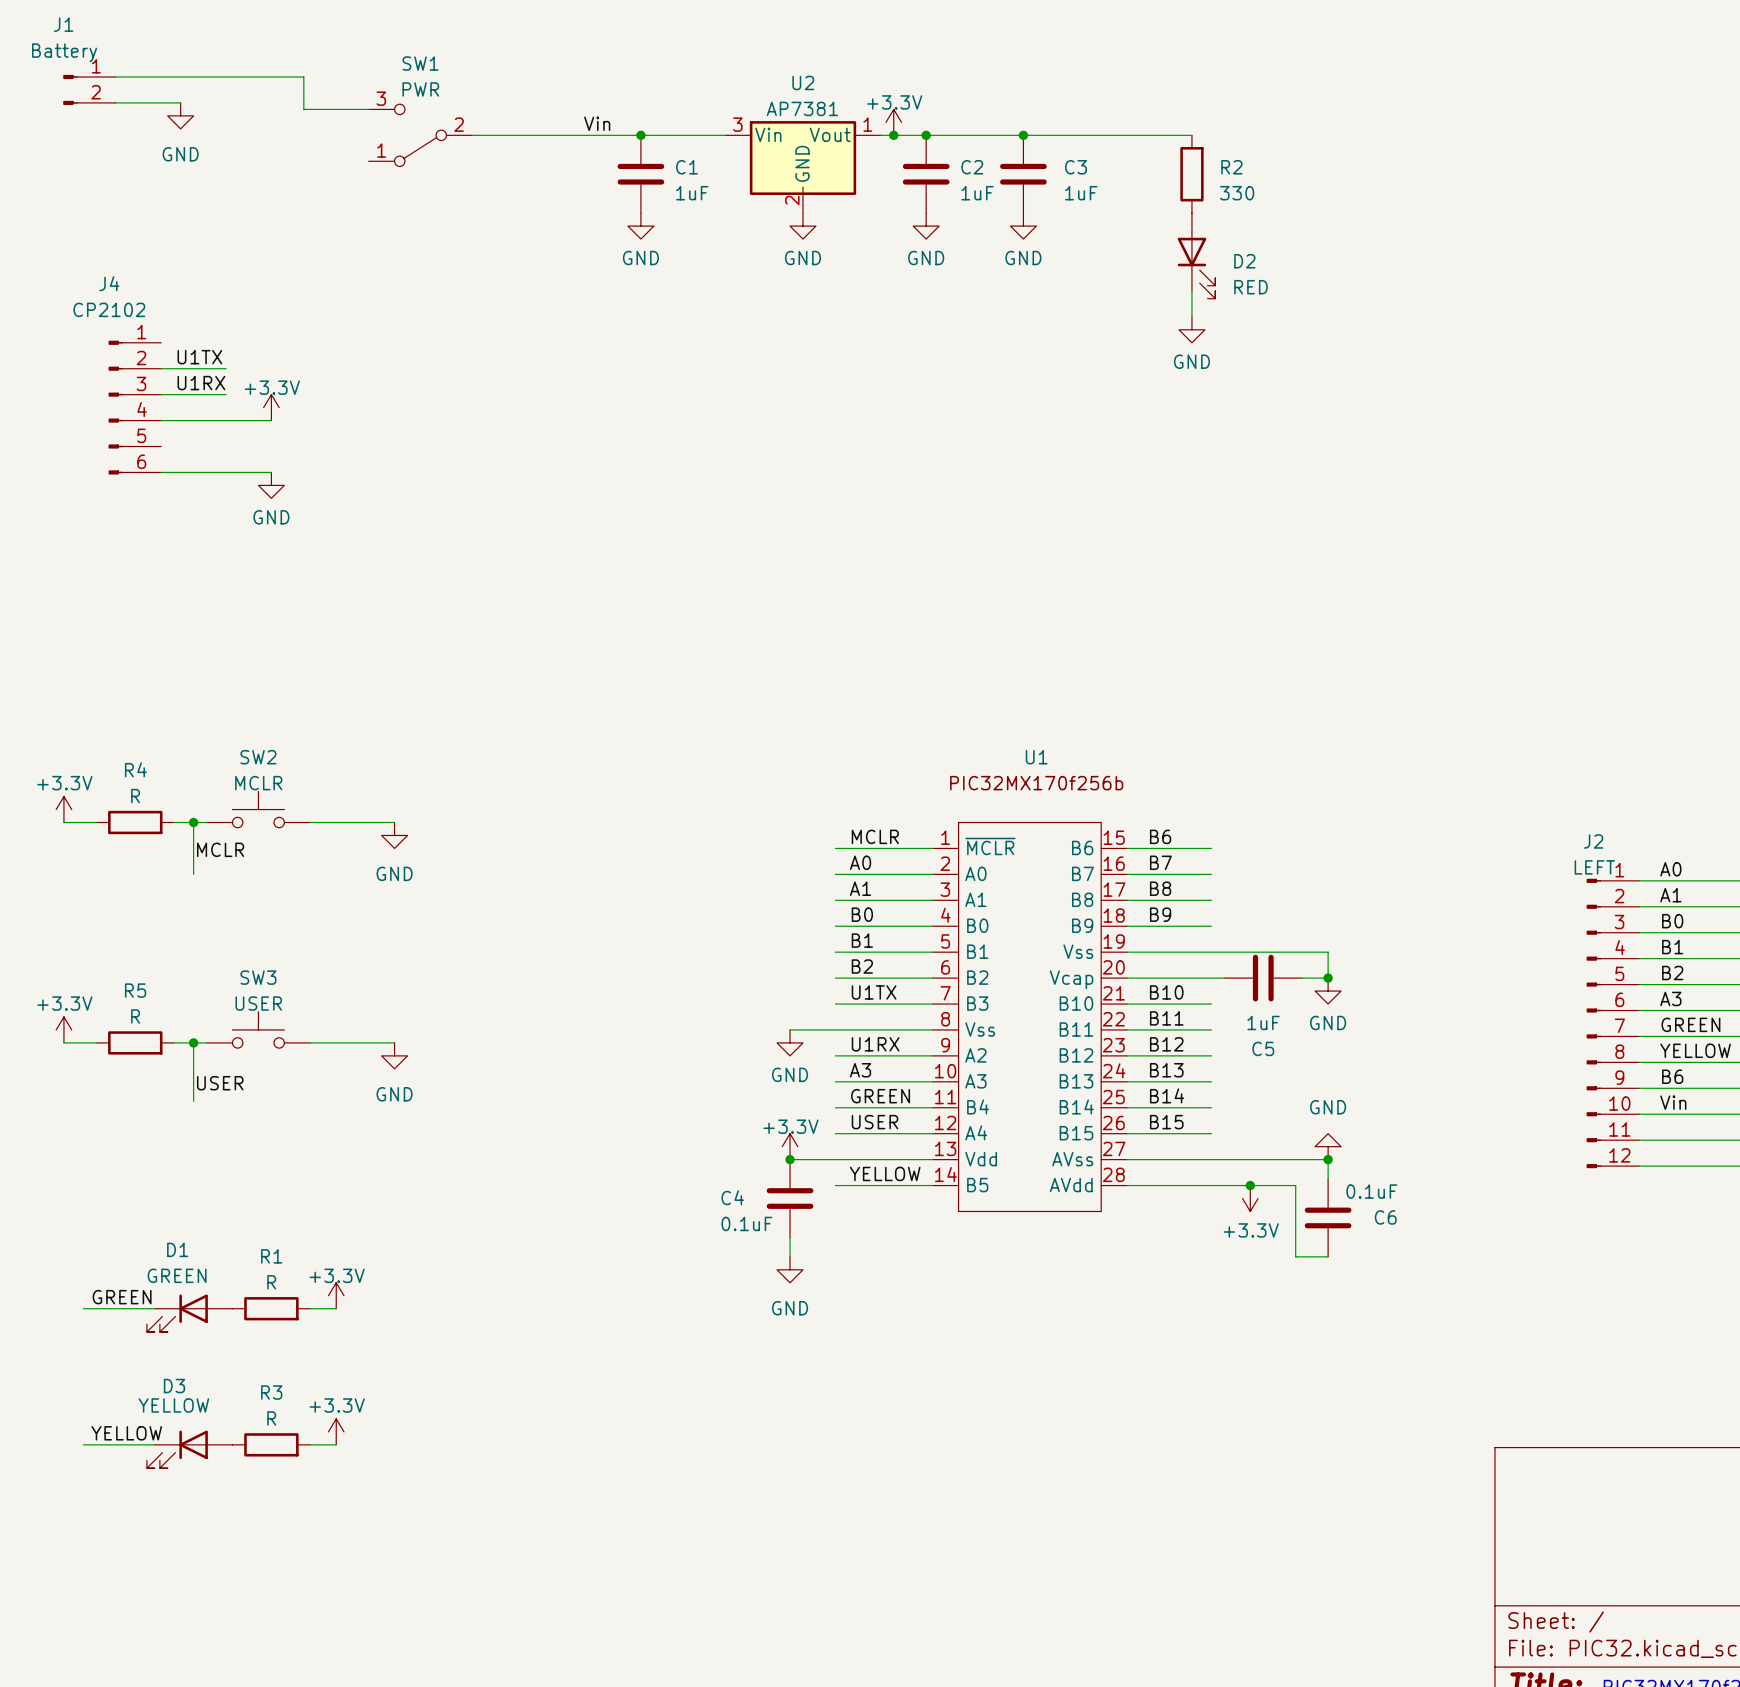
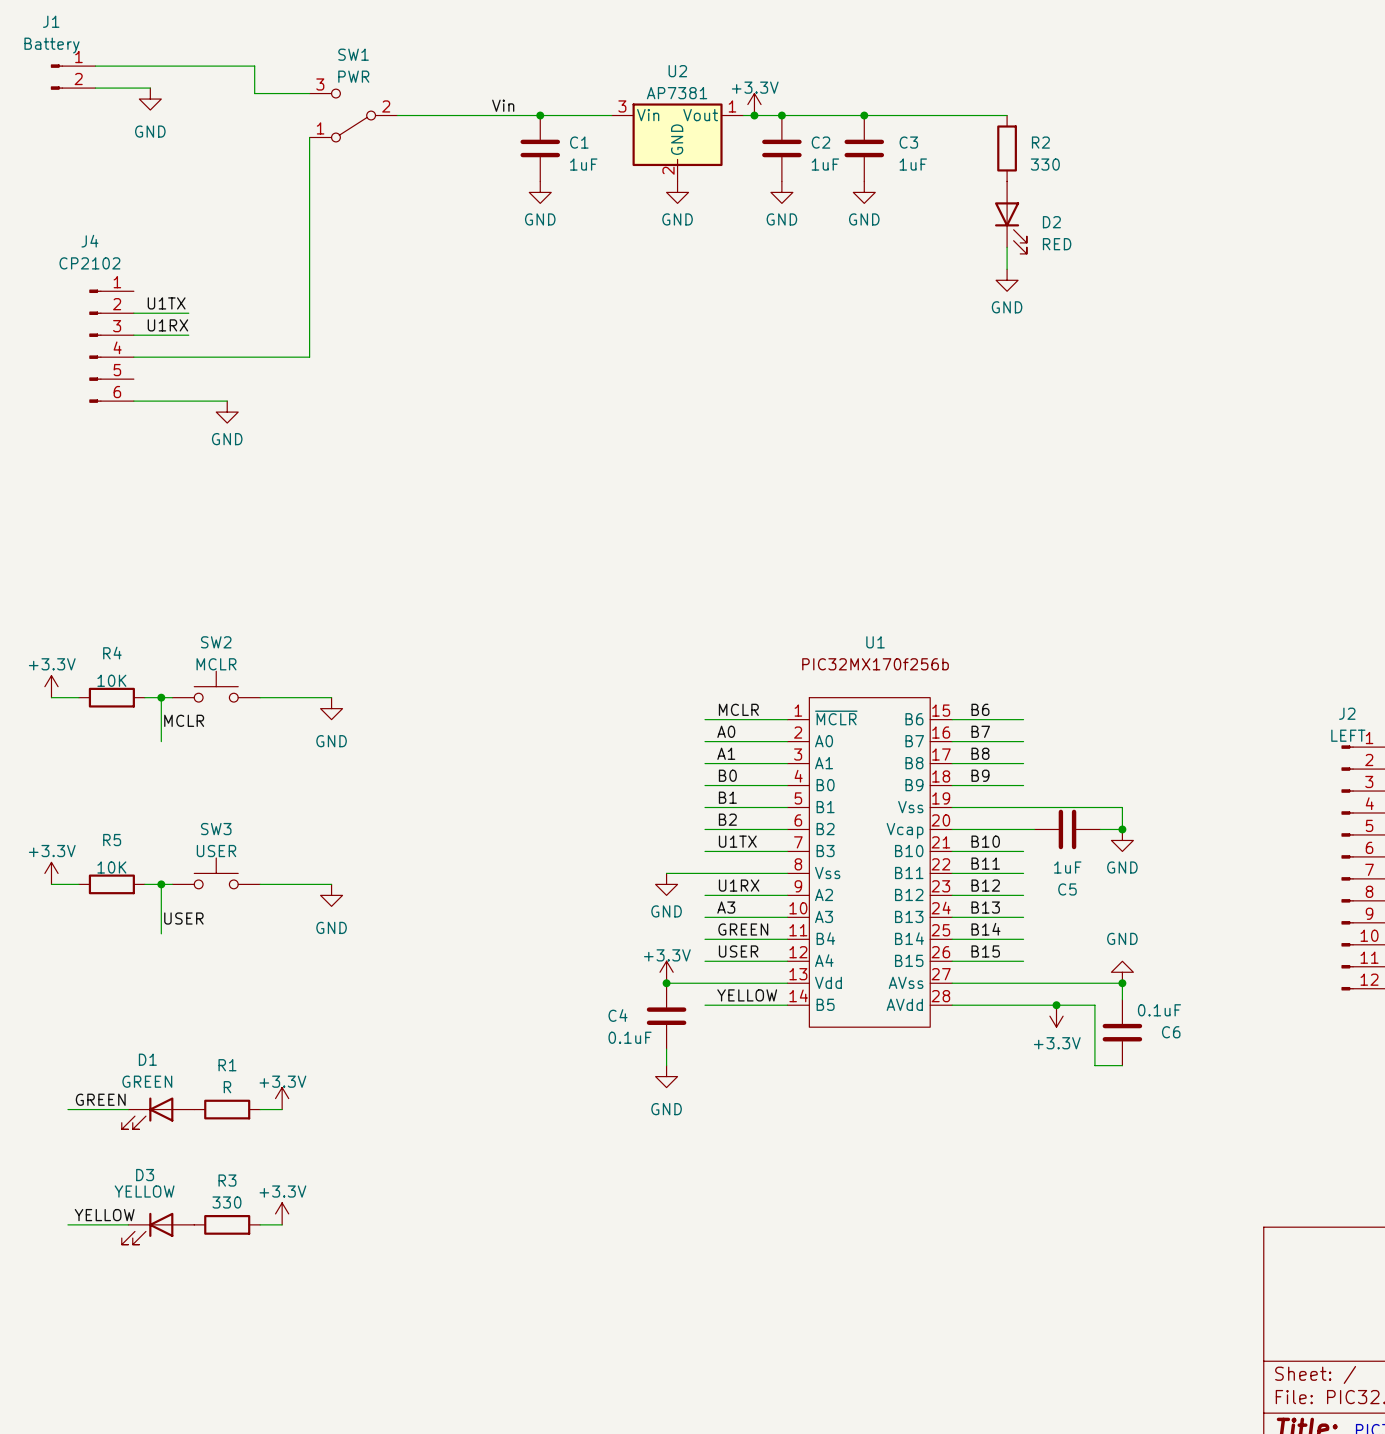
wire: none -> (309, 137) (309, 357) (227, 357)
power symbol: +3.3V (271, 407) -> none
R4 value: R (135, 796) -> 10K (111, 680)
R5 value: R (135, 1016) -> 10K (111, 867)
R3 value: R (271, 1418) -> 330 (226, 1202)

